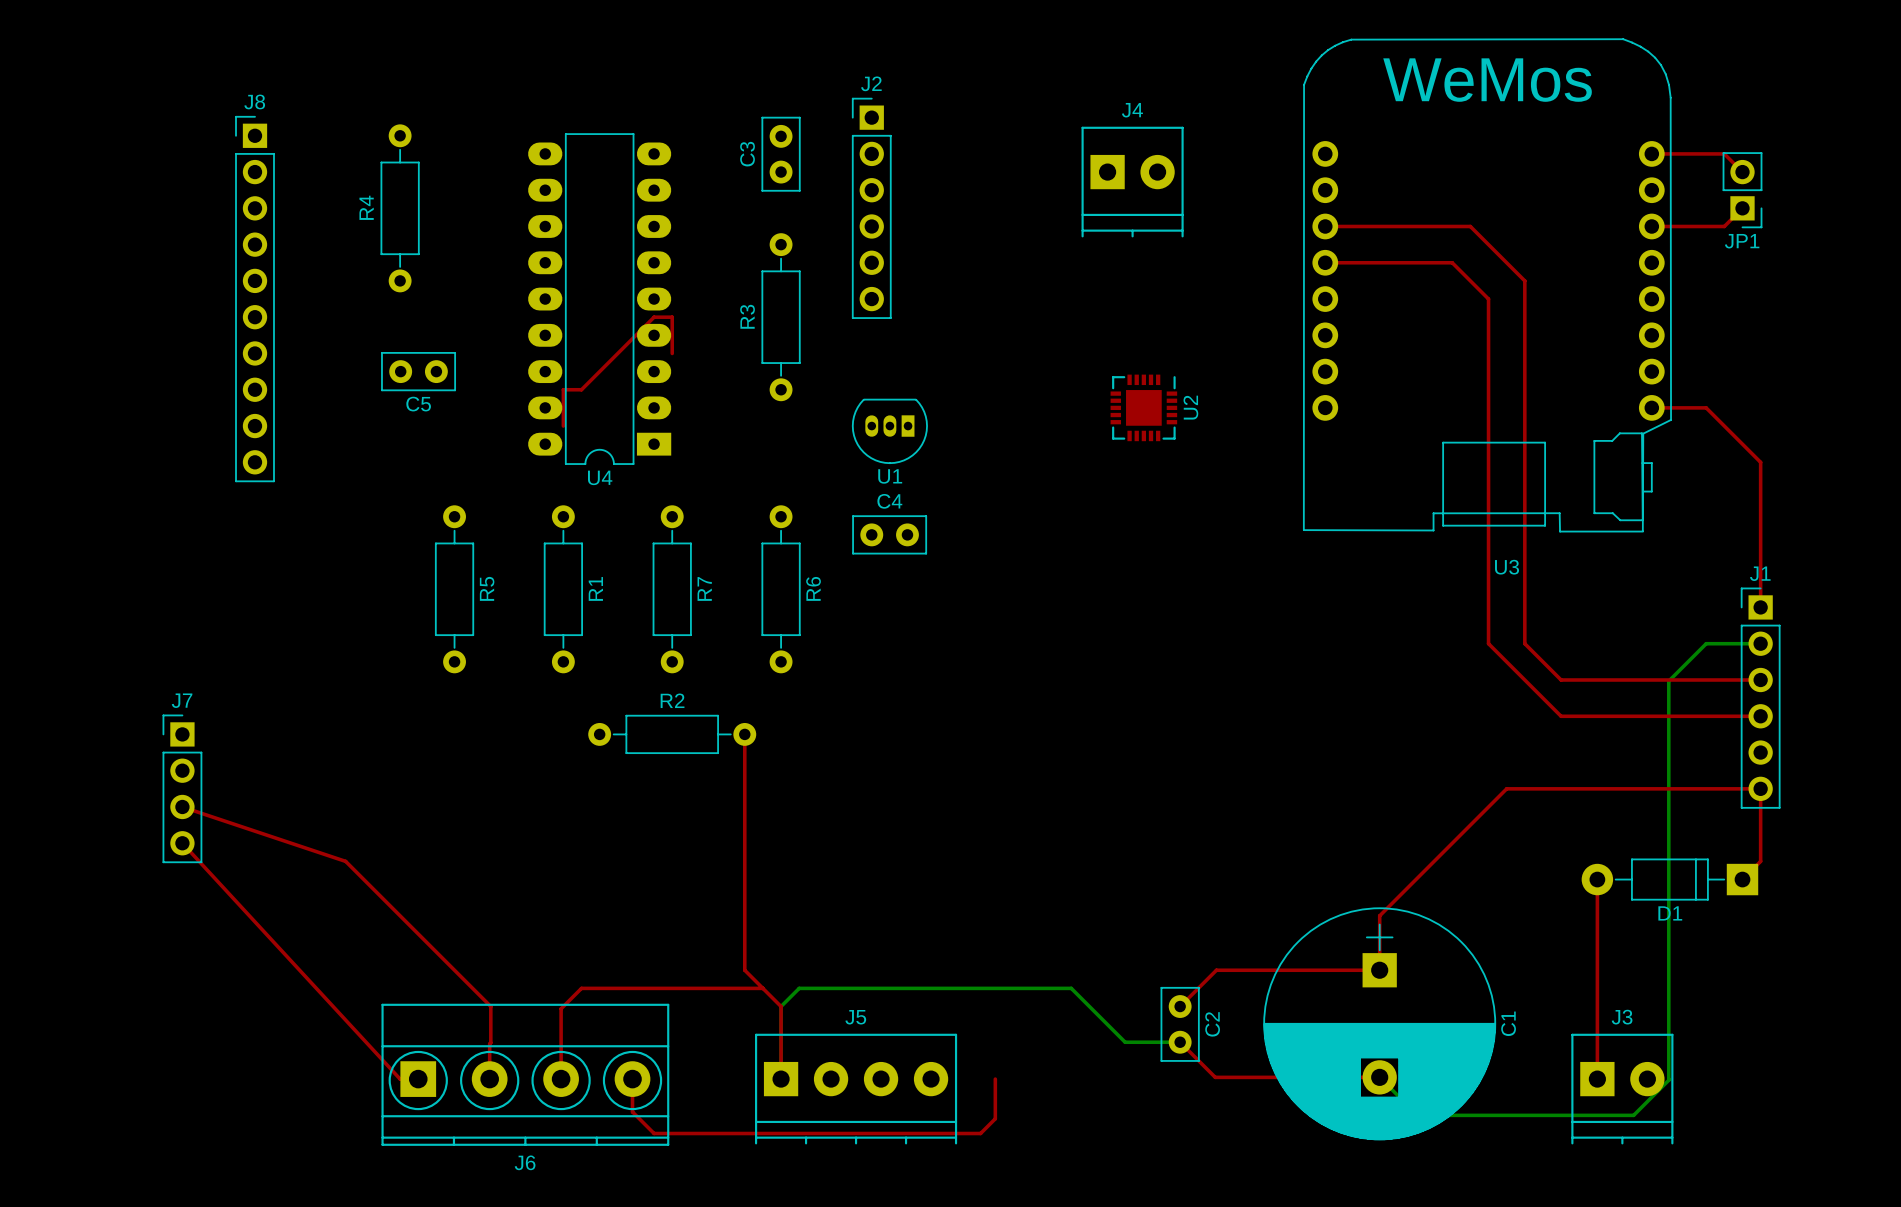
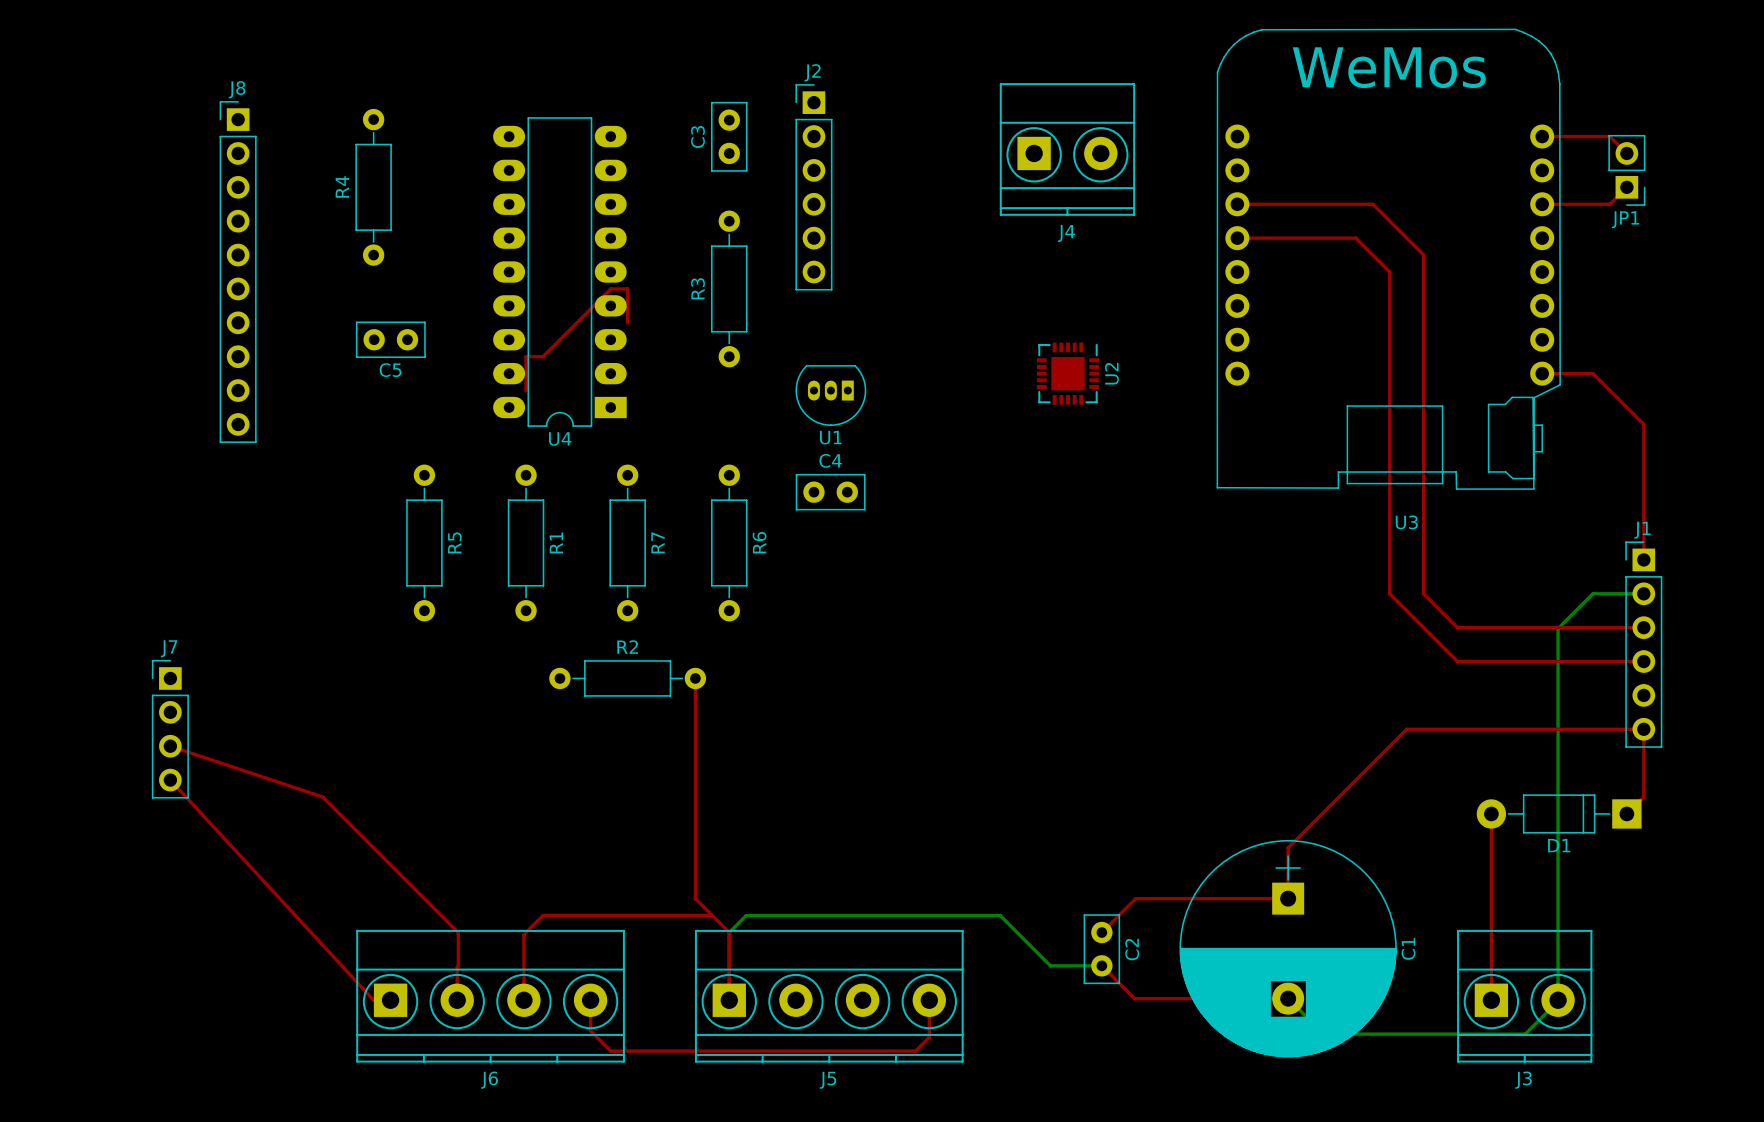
J4 name position: J4 (1132, 110) -> J4 (1066, 233)
J4 footprint: [1081, 126, 1184, 238] -> [999, 83, 1136, 216]
J5 name position: J5 (855, 1017) -> J5 (828, 1080)
J3 name position: J3 (1622, 1017) -> J3 (1523, 1080)
J5 footprint: [755, 1033, 958, 1145] -> [694, 929, 964, 1063]
J3 footprint: [1571, 1033, 1674, 1145] -> [1457, 929, 1593, 1063]

